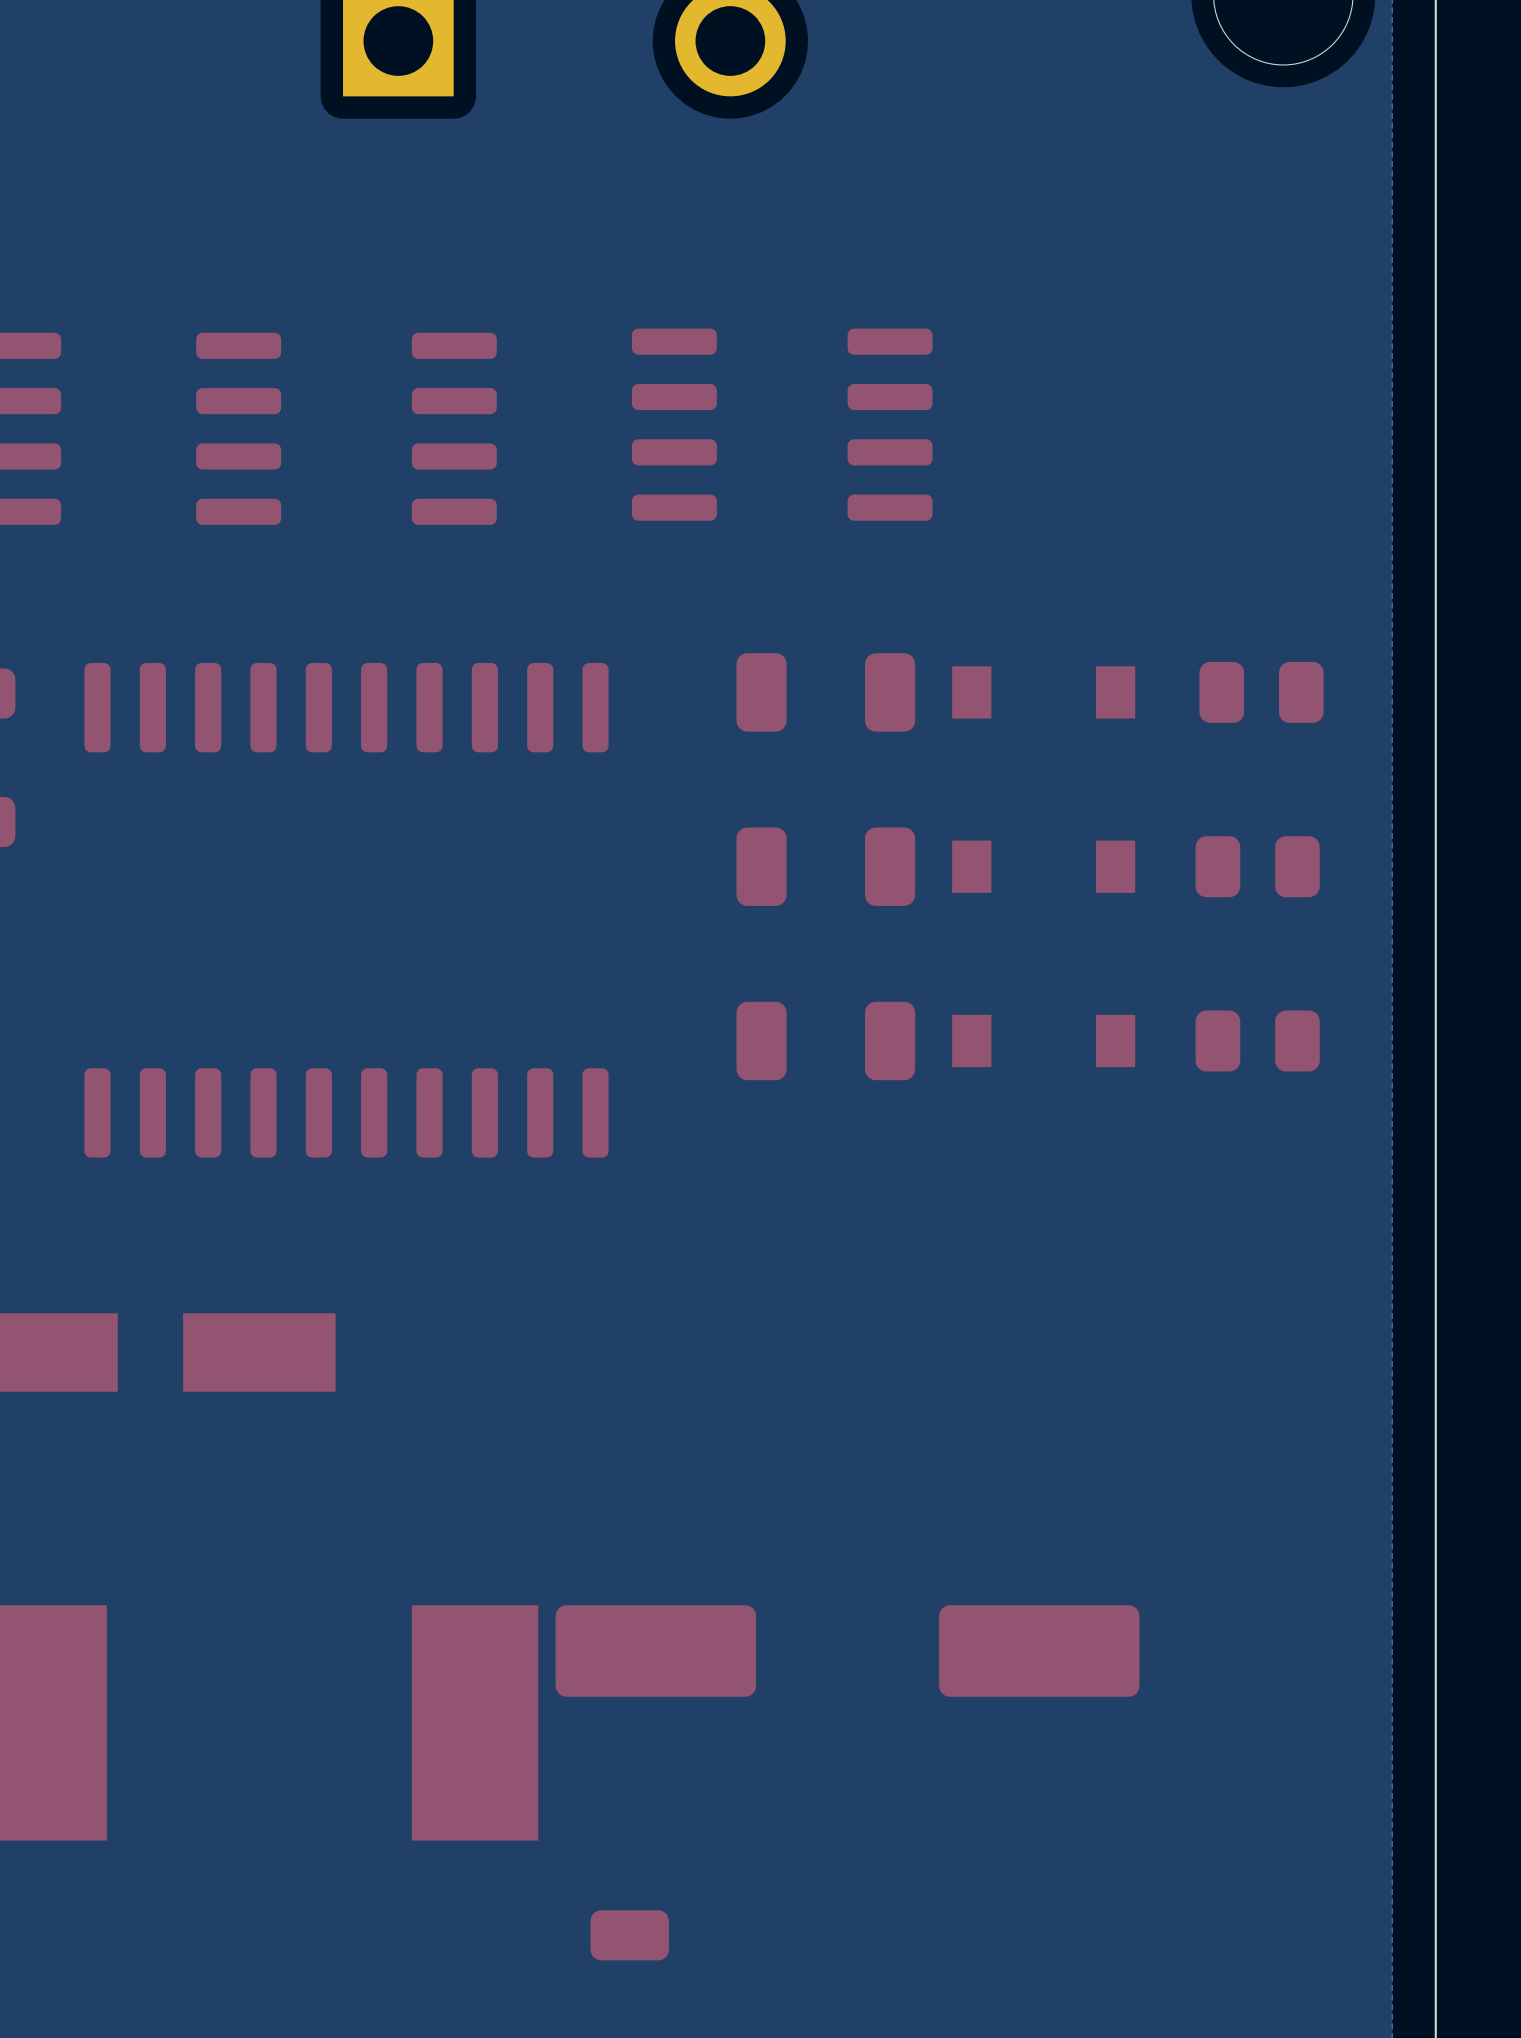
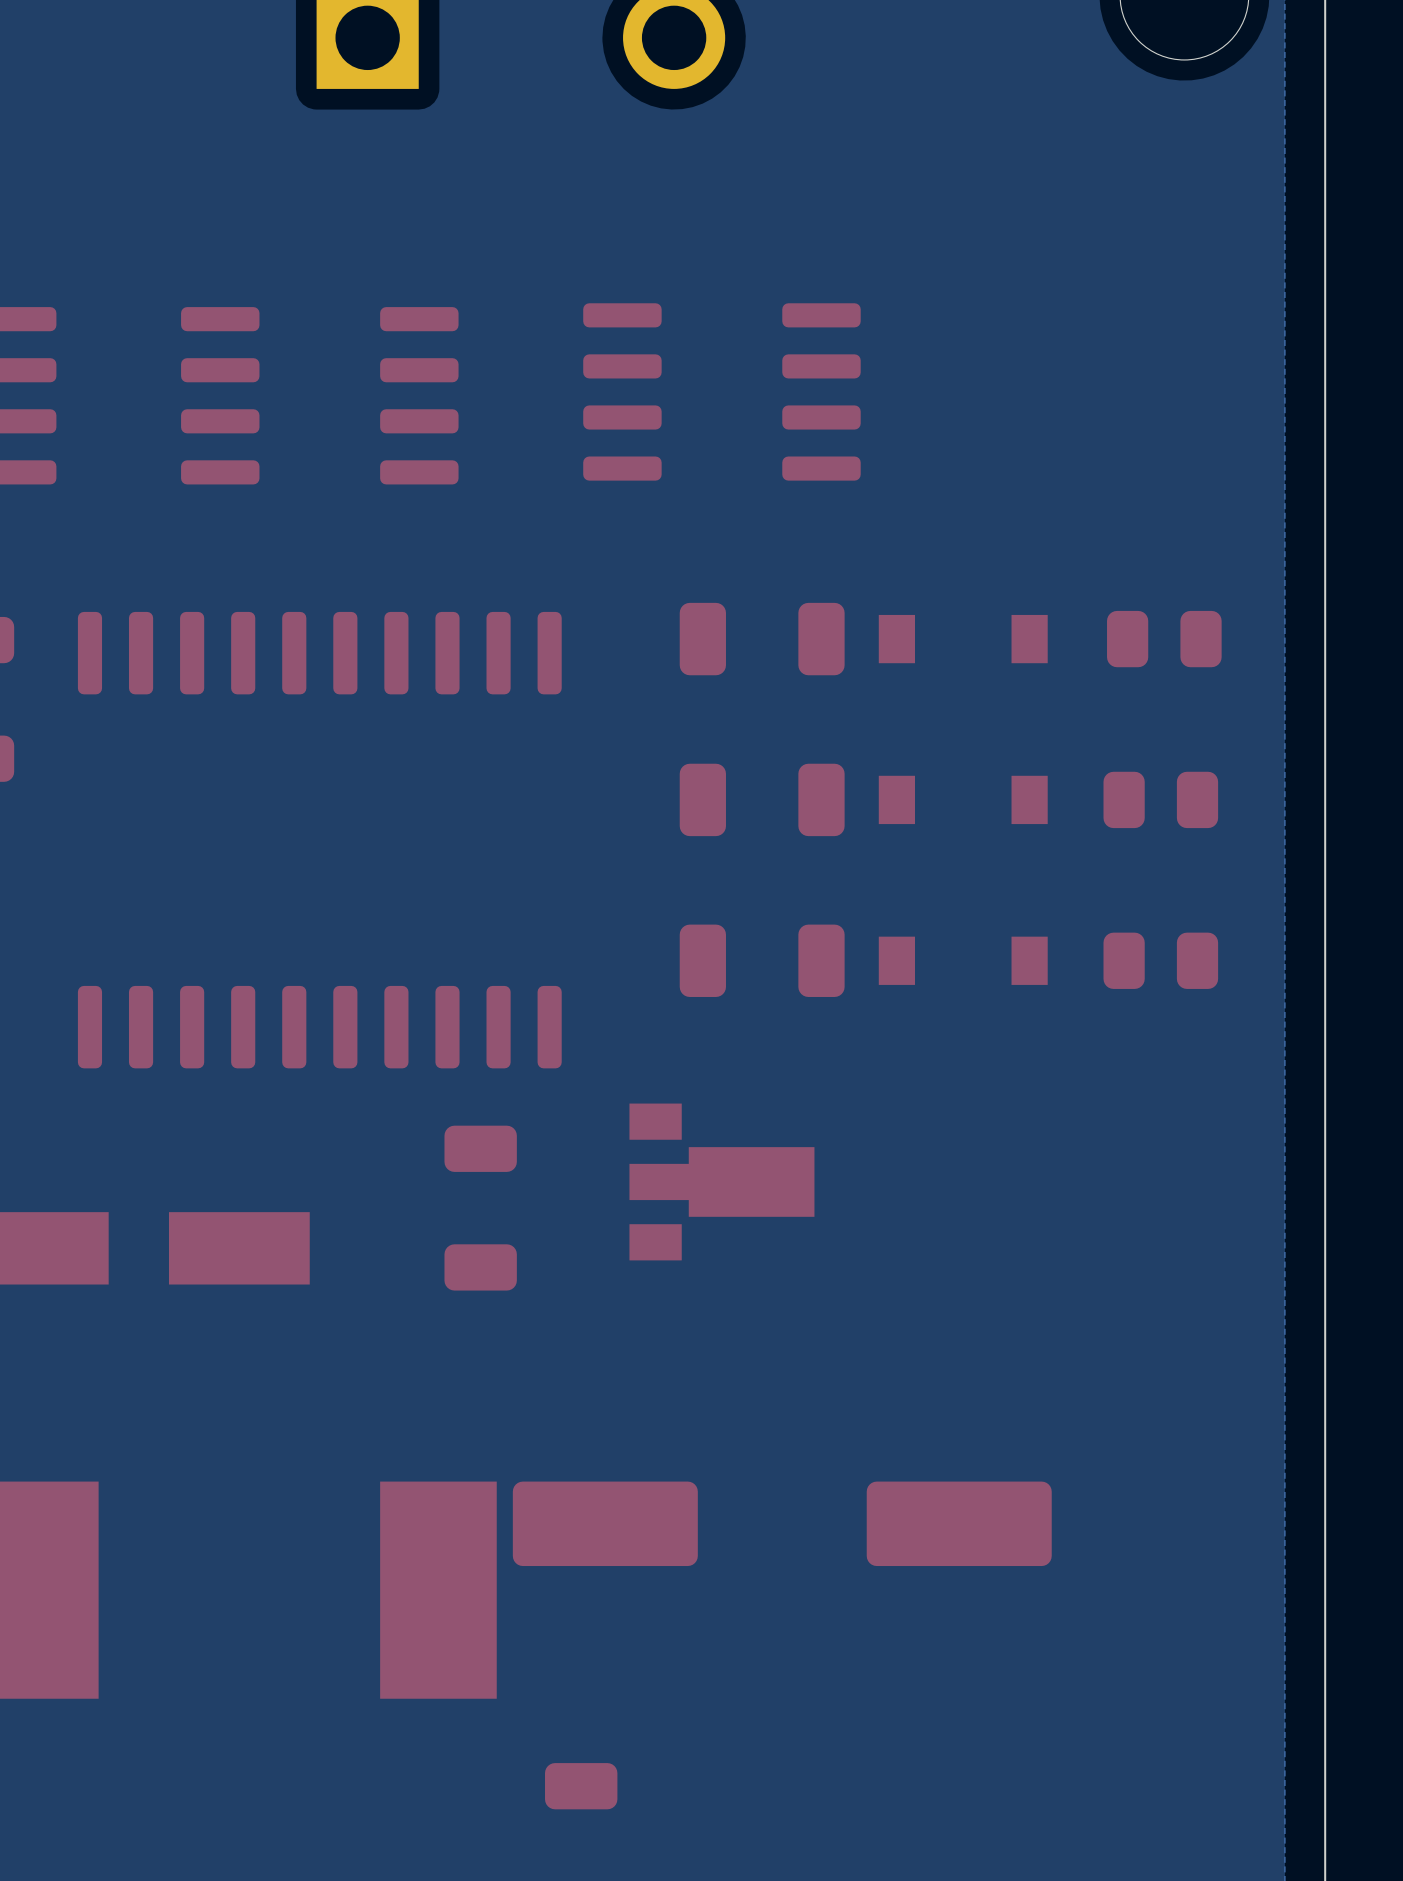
part: none -> (721, 1181)
part: none -> (480, 1208)

